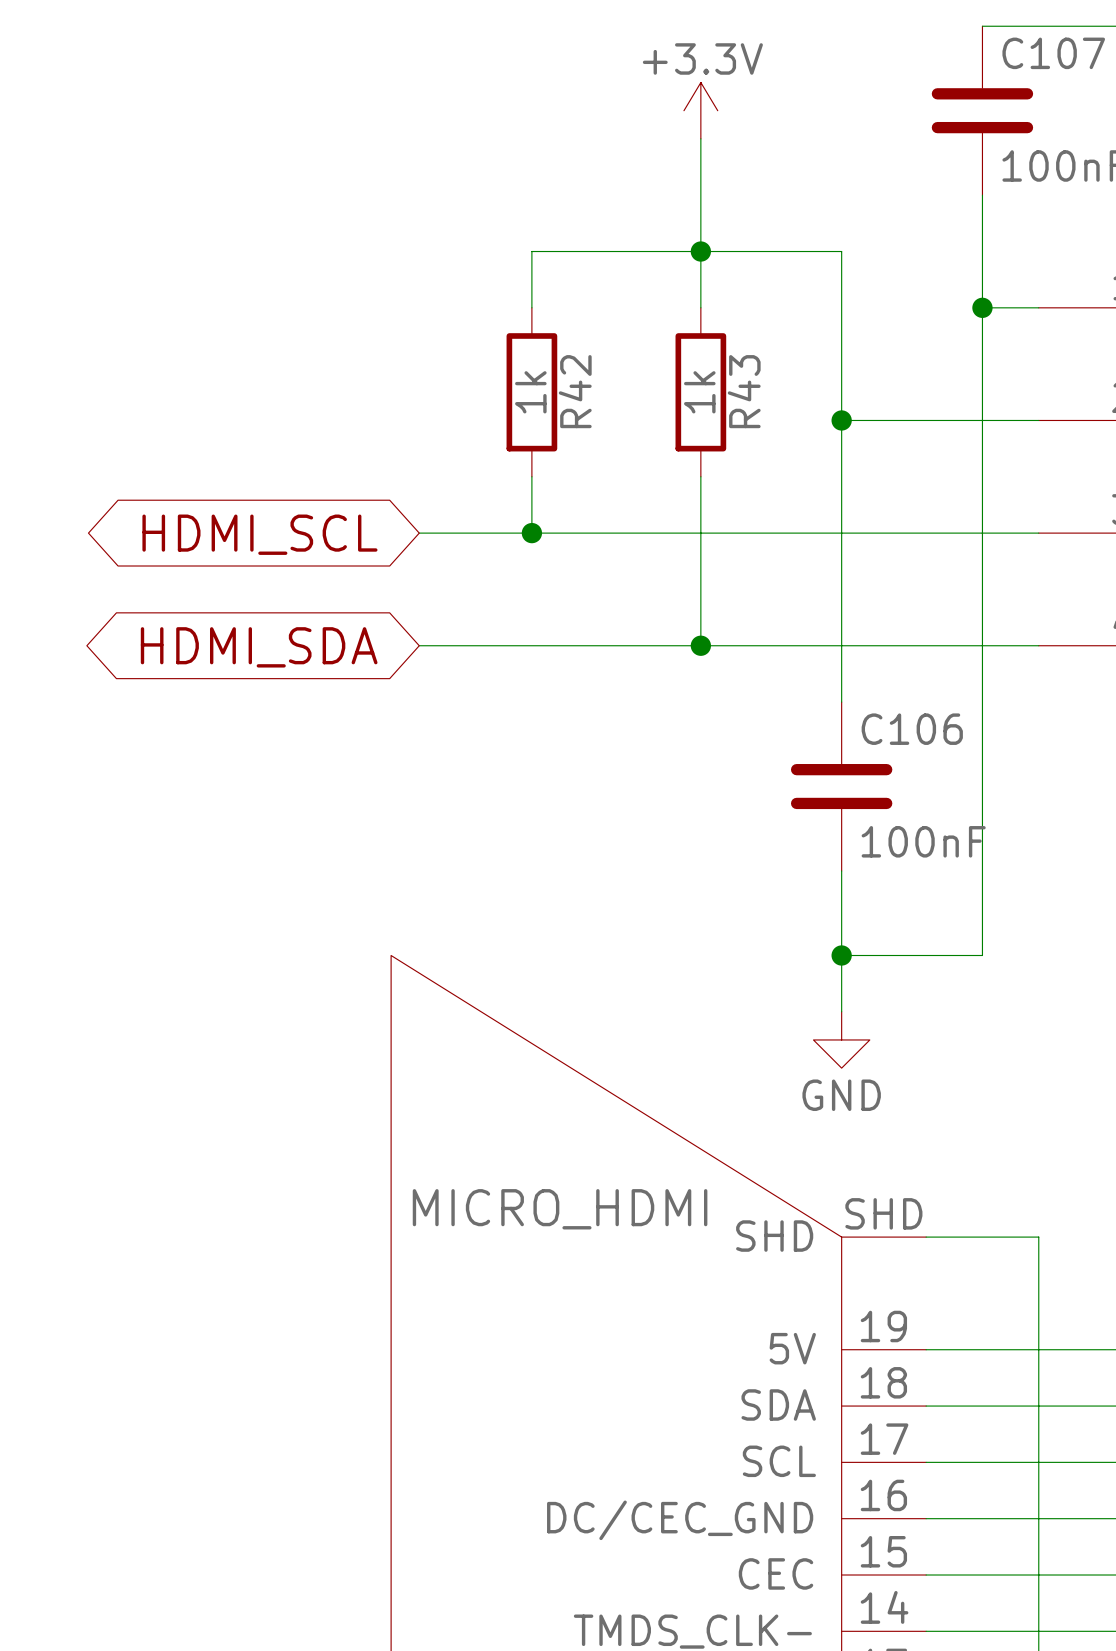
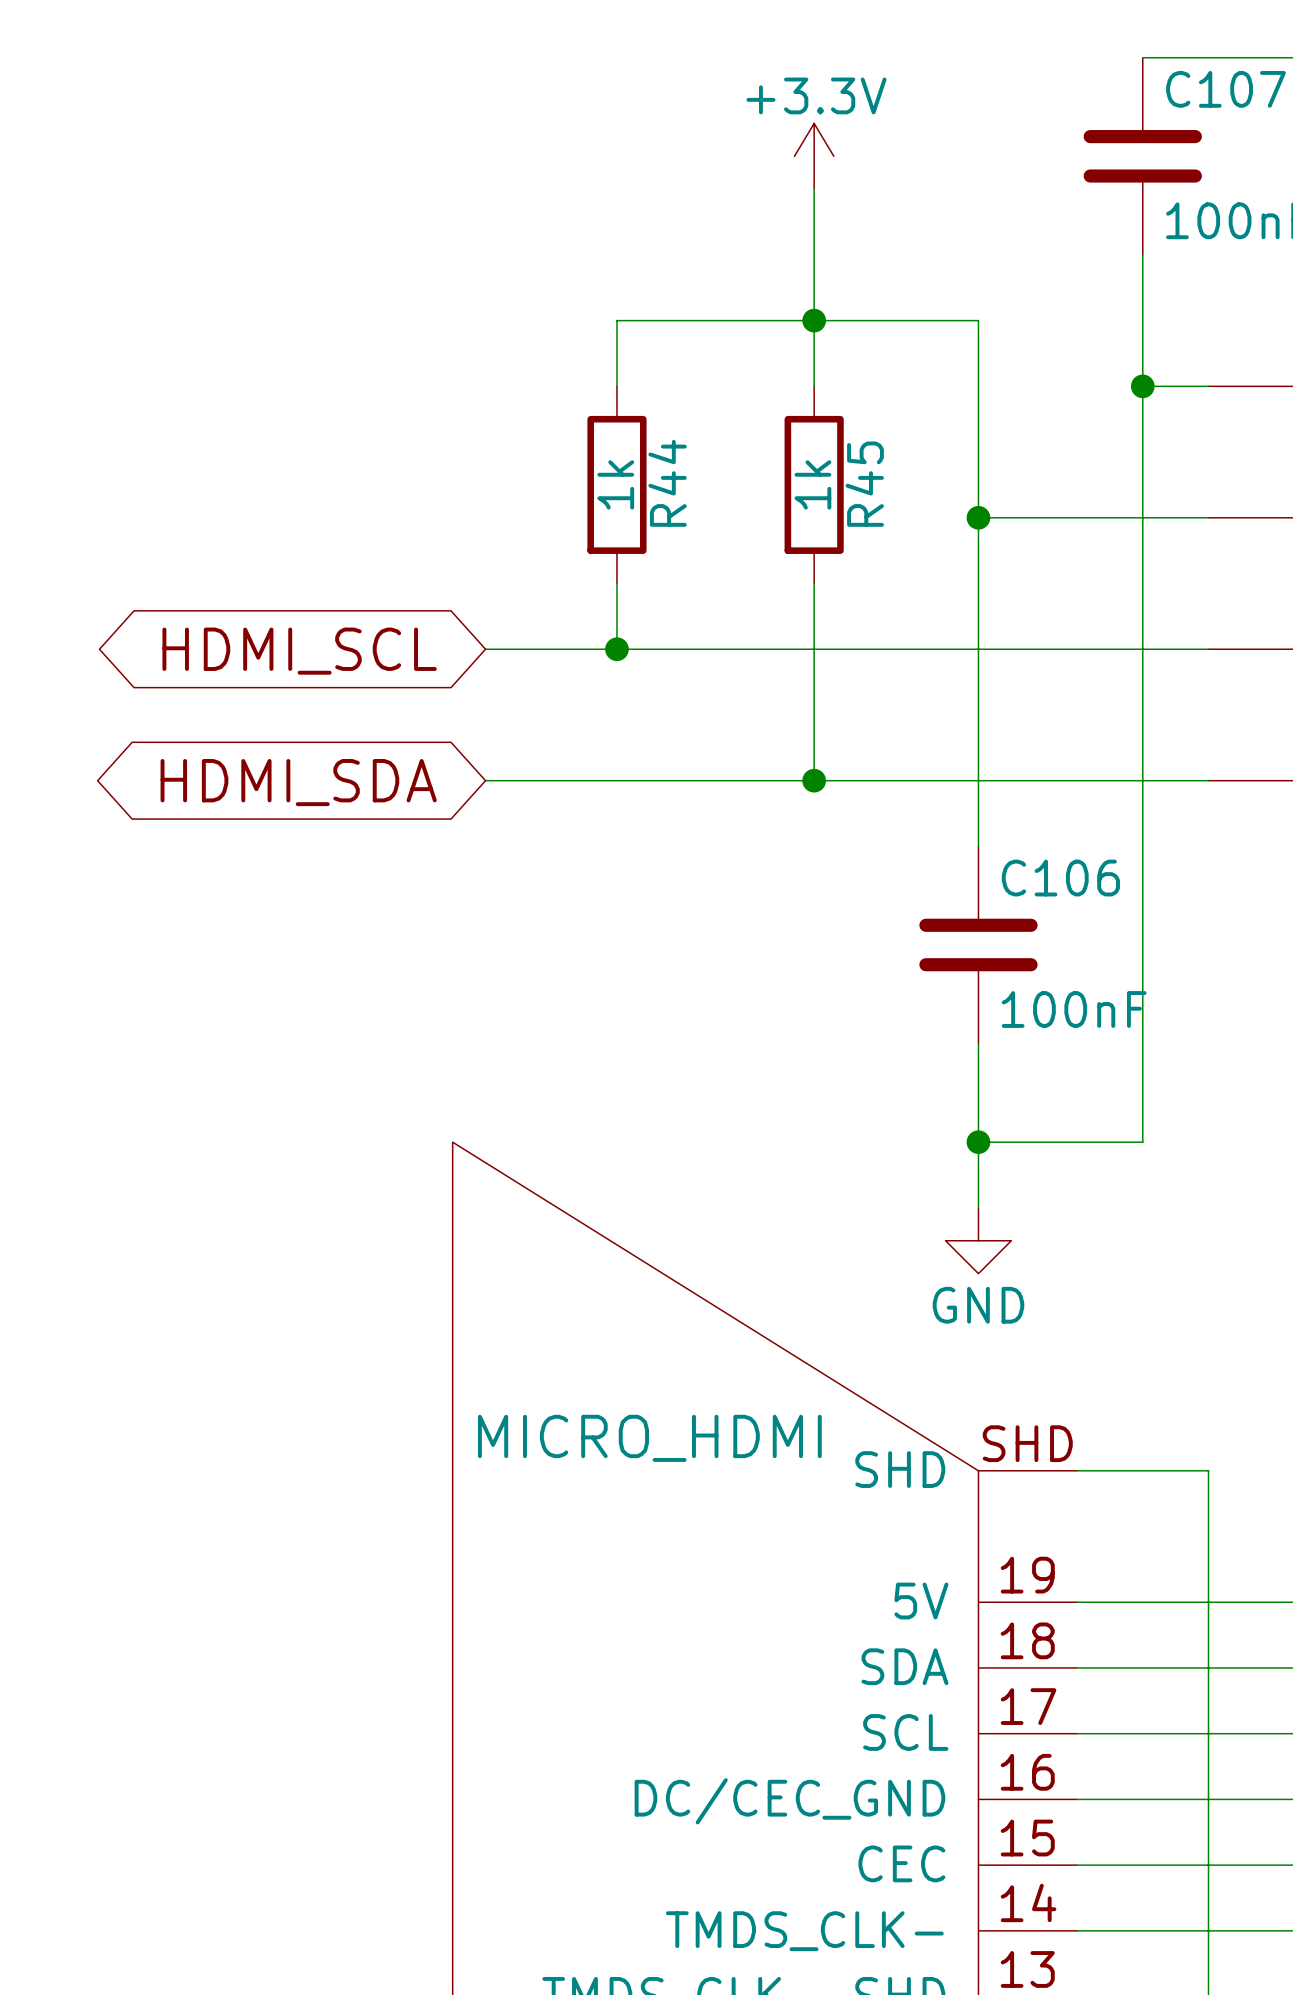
R42 name: R42 (575, 391) -> R44 (667, 483)
R43 name: R43 (744, 391) -> R45 (864, 484)

